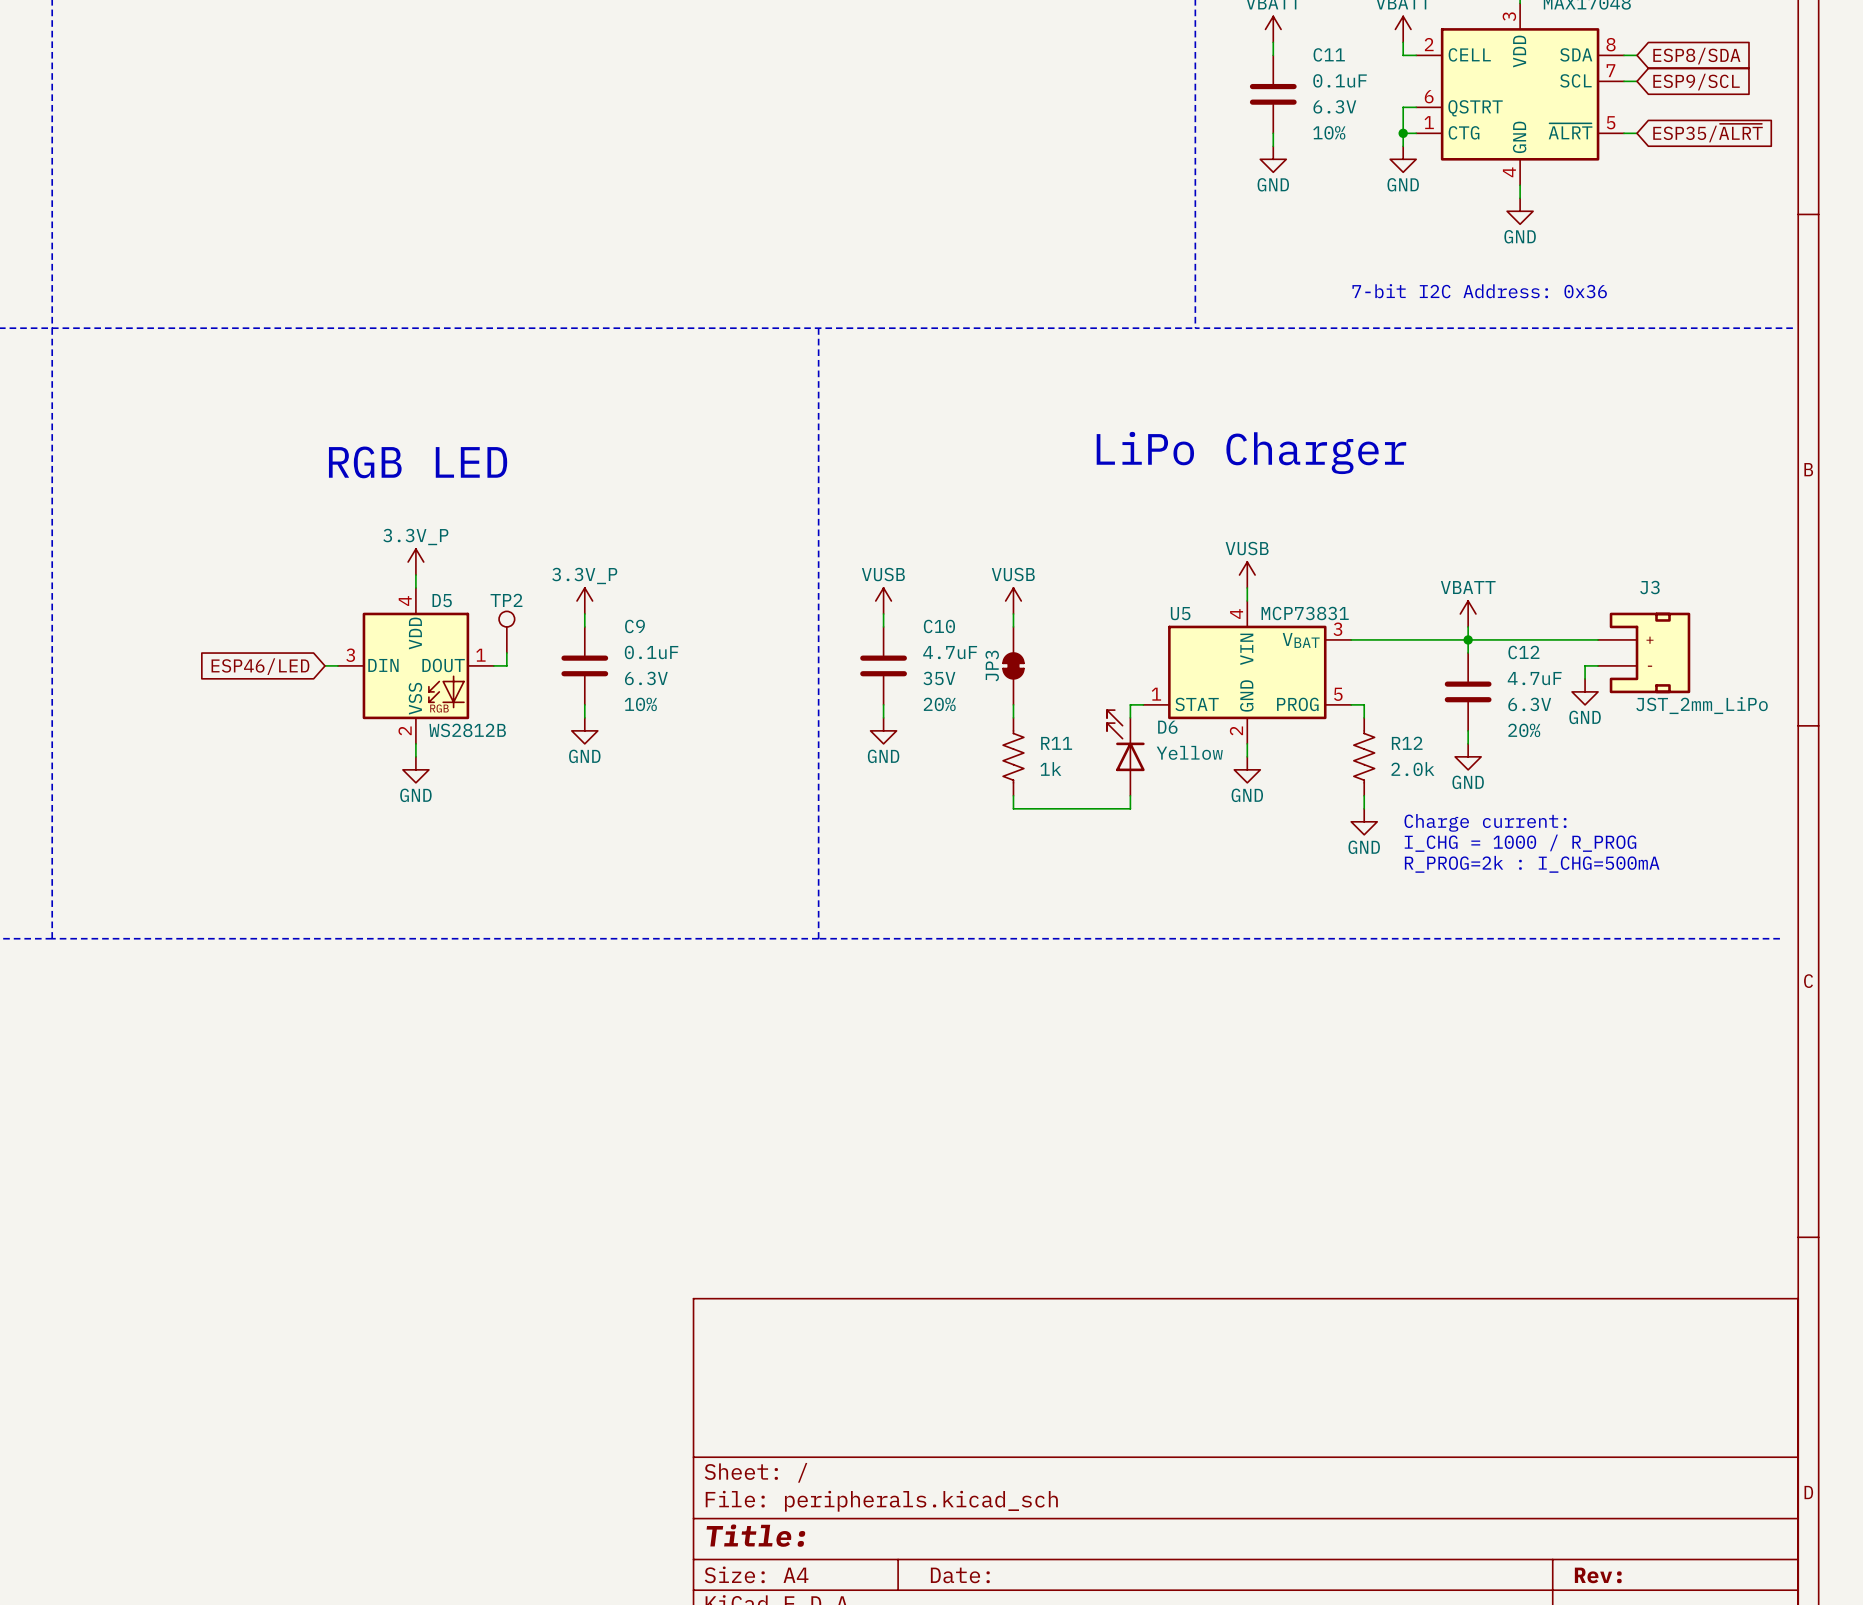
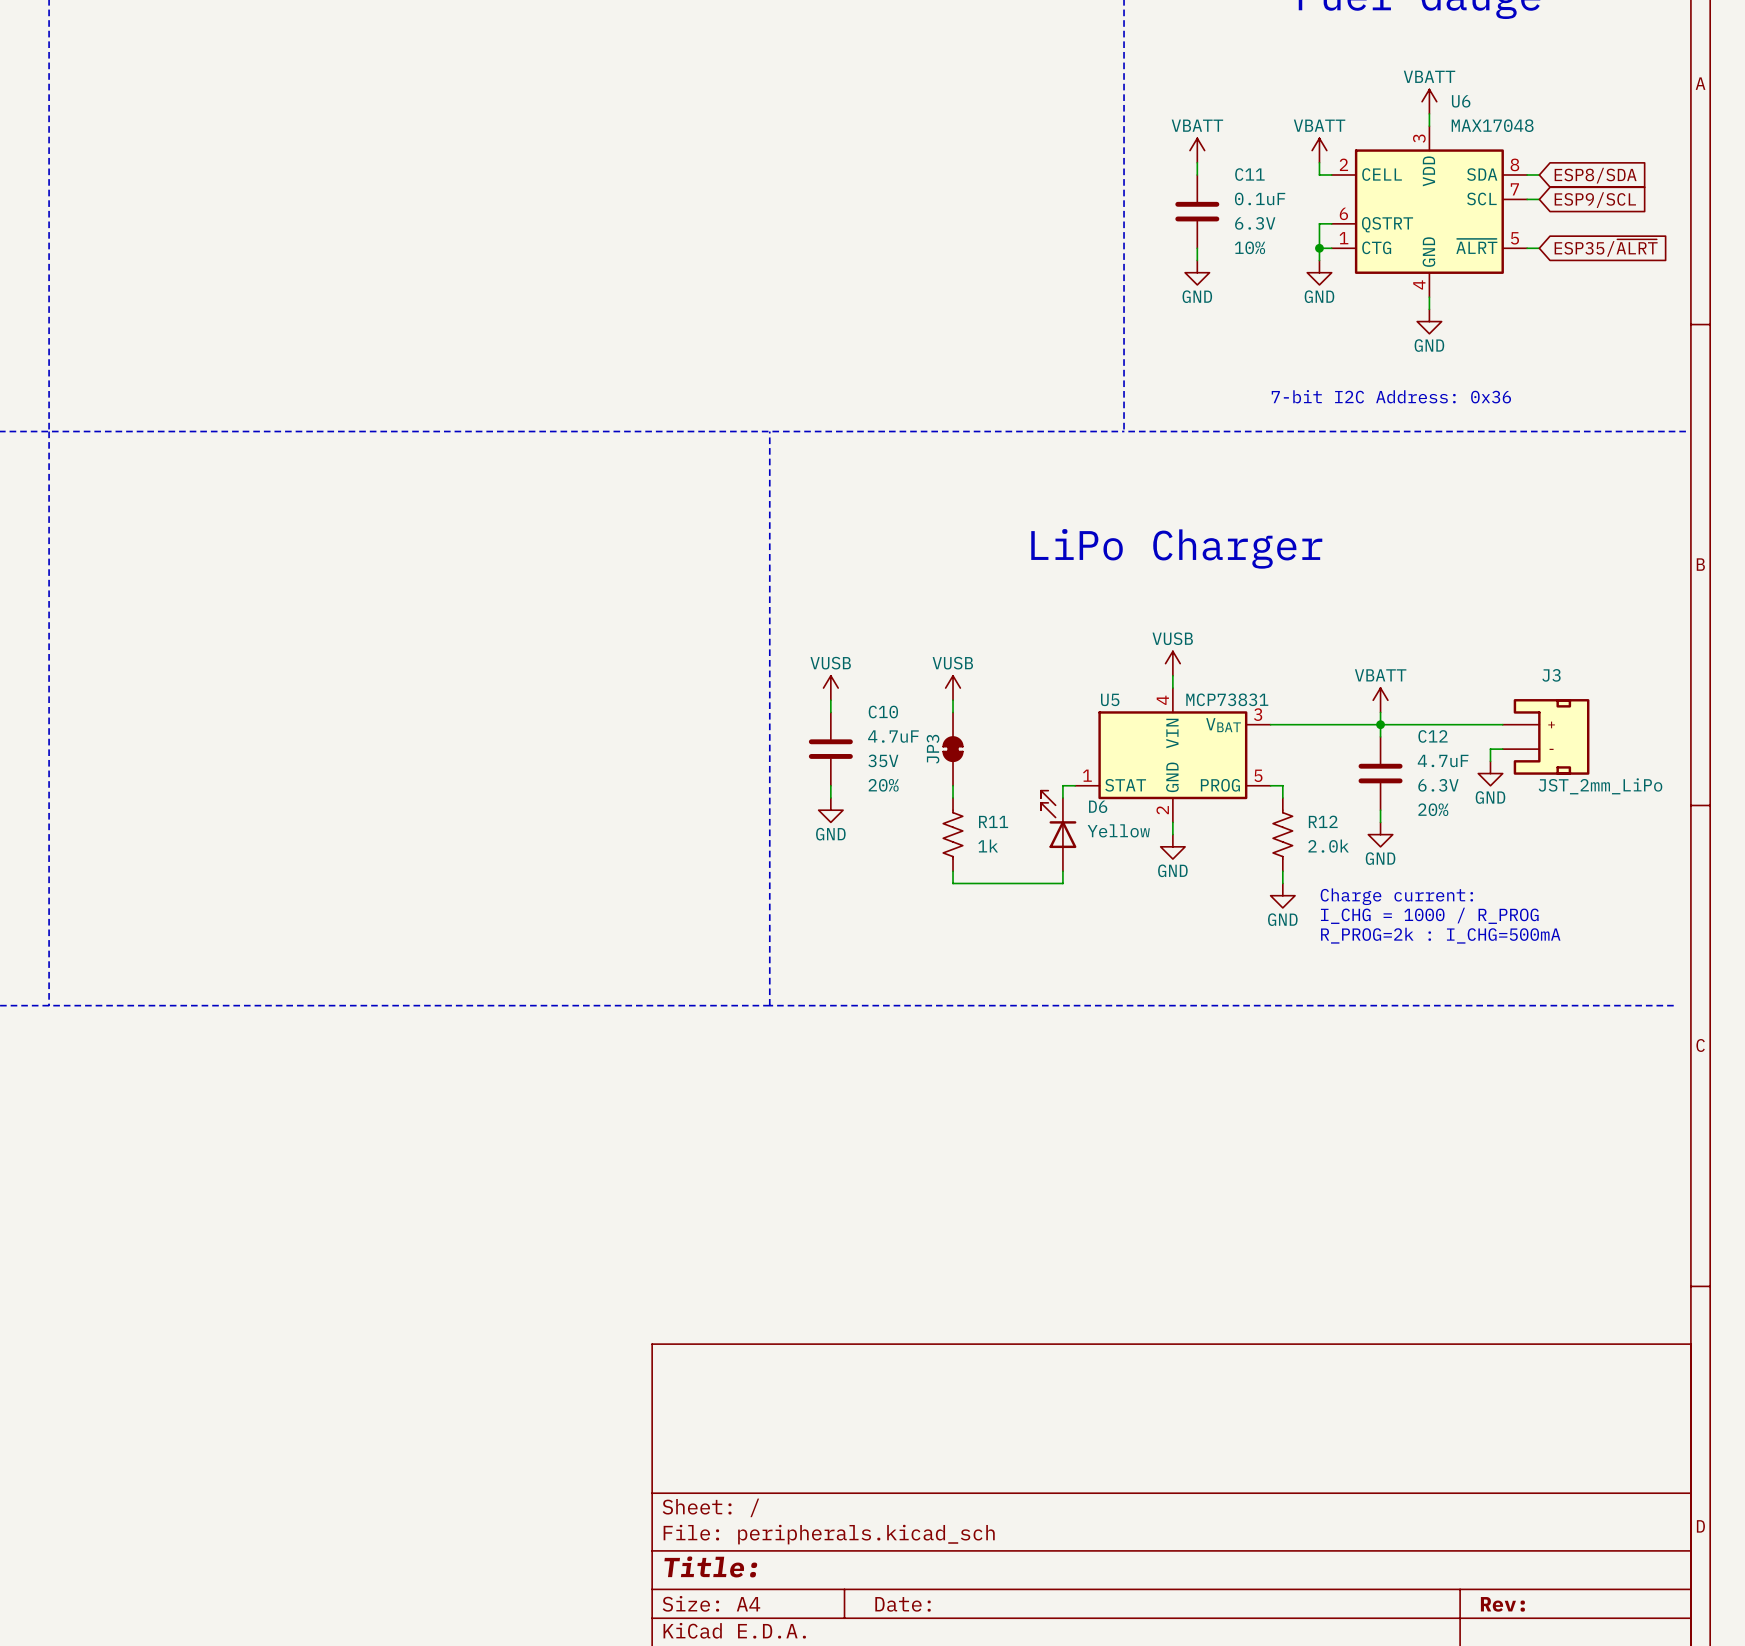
text: RGB LED (418, 462) -> none
power symbol: 3.3V_P (415, 562) -> none
wire: (415, 575) (415, 587) -> none
power symbol: 3.3V_P (584, 600) -> none
wire: (584, 613) (584, 626) -> none
TP2: (506, 632) -> none
wire: (506, 652) (506, 665) (493, 665) -> none
wire: (324, 665) (337, 665) -> none
D5: WS2812B (415, 665) -> none
C9: 0.1uF (584, 665) -> none
global label: ESP46/LED (260, 666) -> none
wire: (584, 704) (584, 717) -> none
power symbol: GND (584, 730) -> none
wire: (415, 743) (415, 756) -> none
power symbol: GND (415, 769) -> none

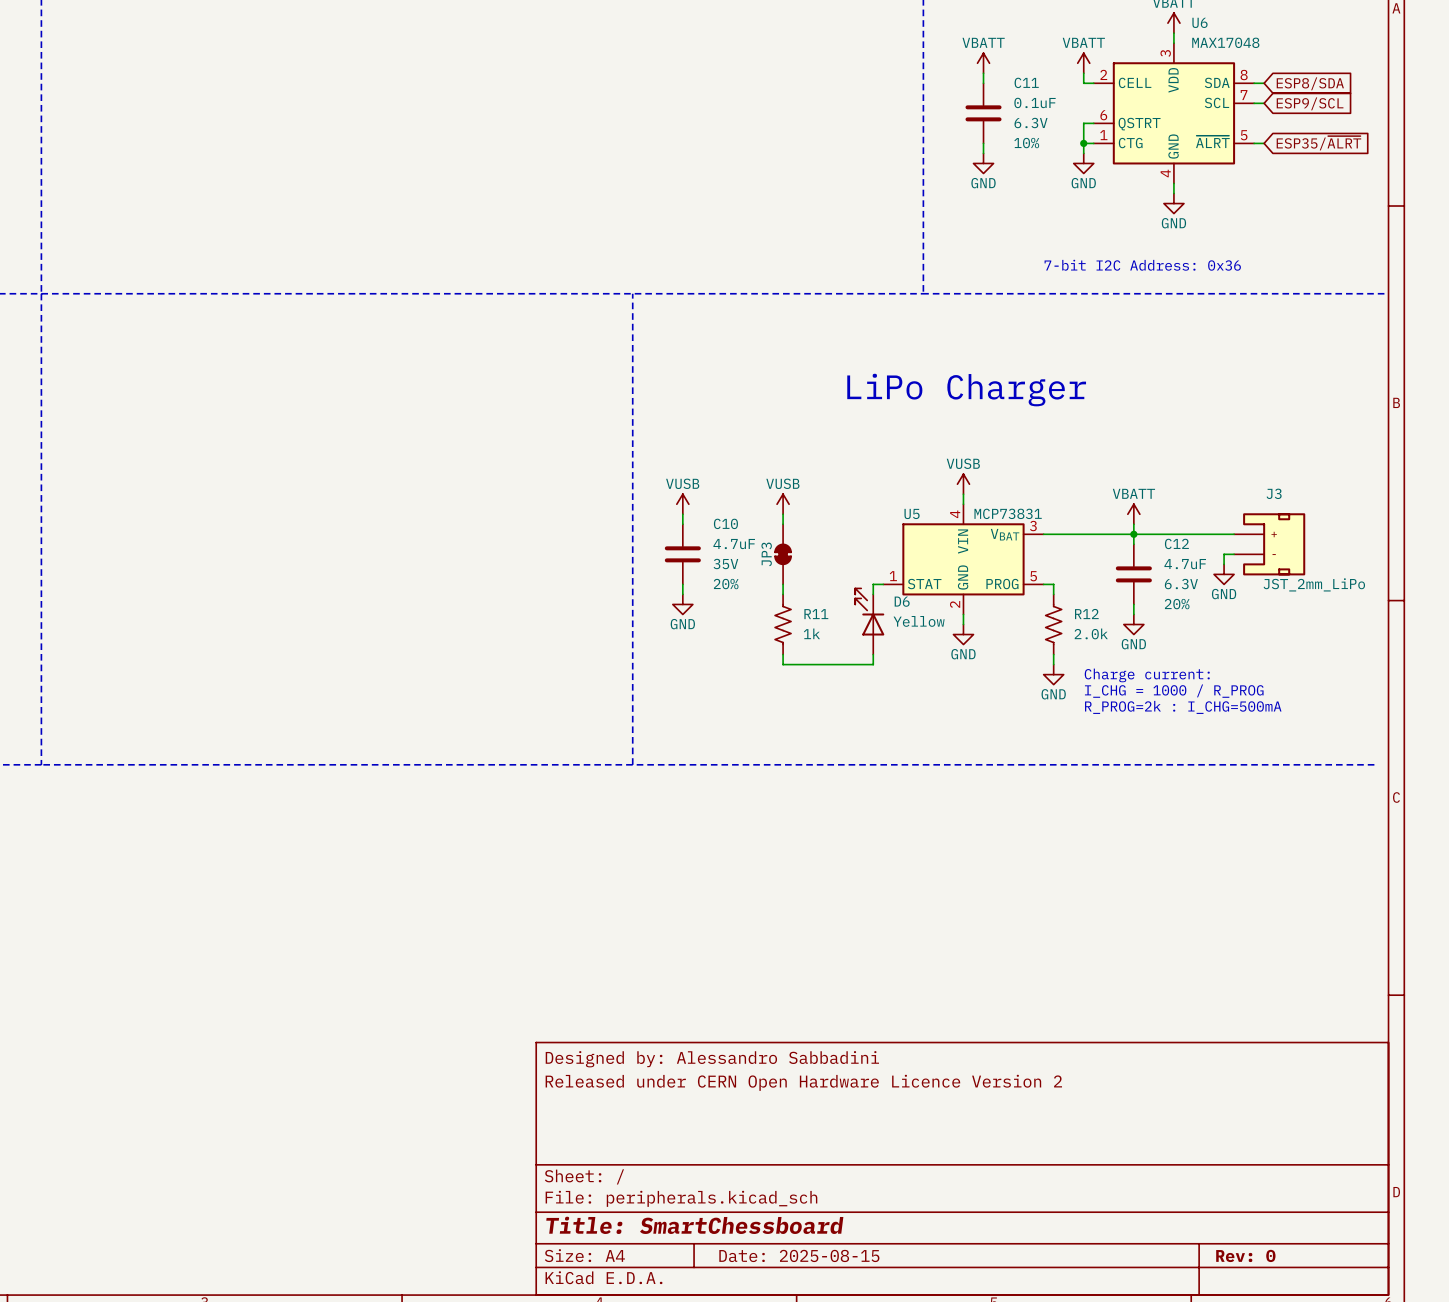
title block: none -> Designed by: Alessandro Sabbadini (712, 1059)
title block: none -> Released under CERN Open Hardware Licence Version 2 (803, 1082)
title block: Title: (710, 1566) -> Title: SmartChessboard (694, 1225)
title block: Date: (903, 1604) -> Date: 2025-08-15 (799, 1255)
title block: Rev: (1502, 1604) -> Rev: 0 (1245, 1255)

